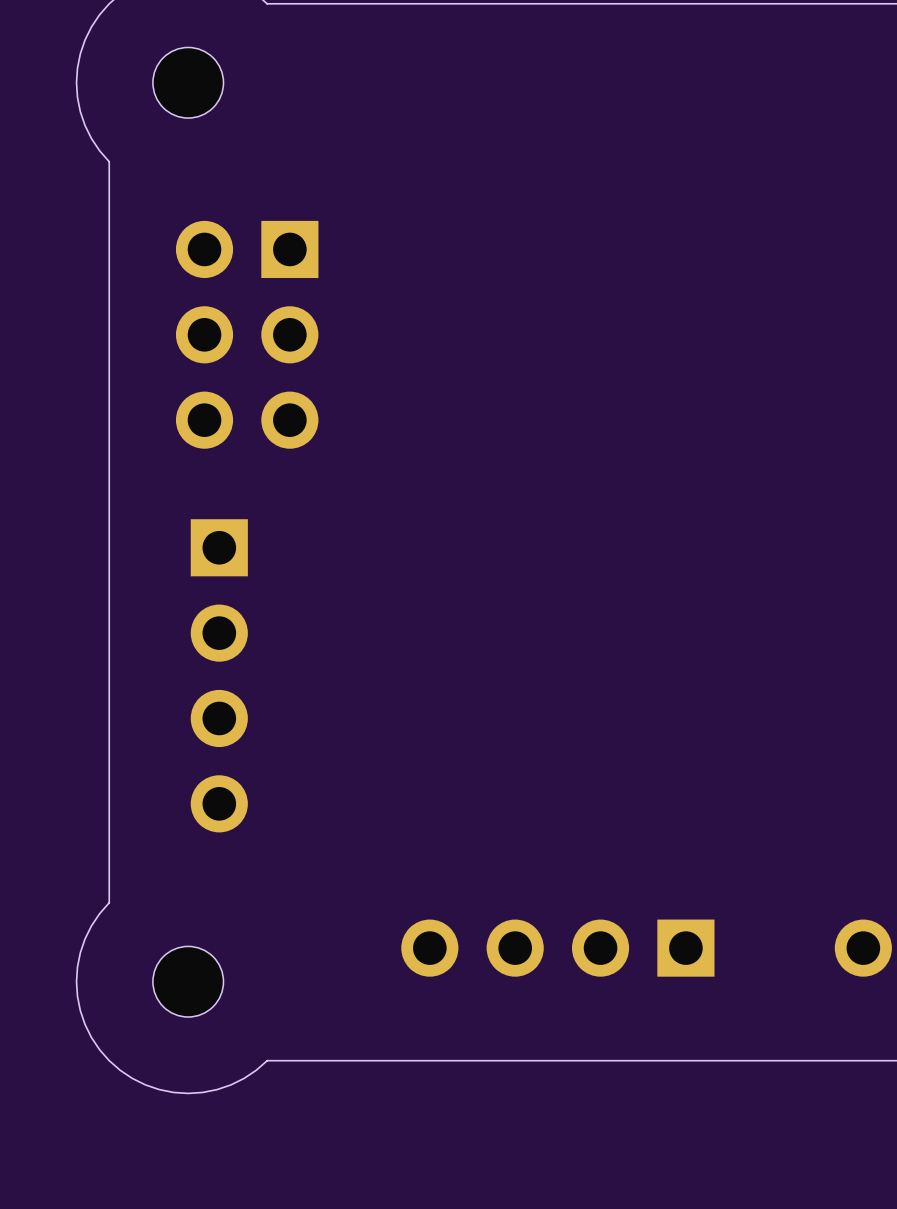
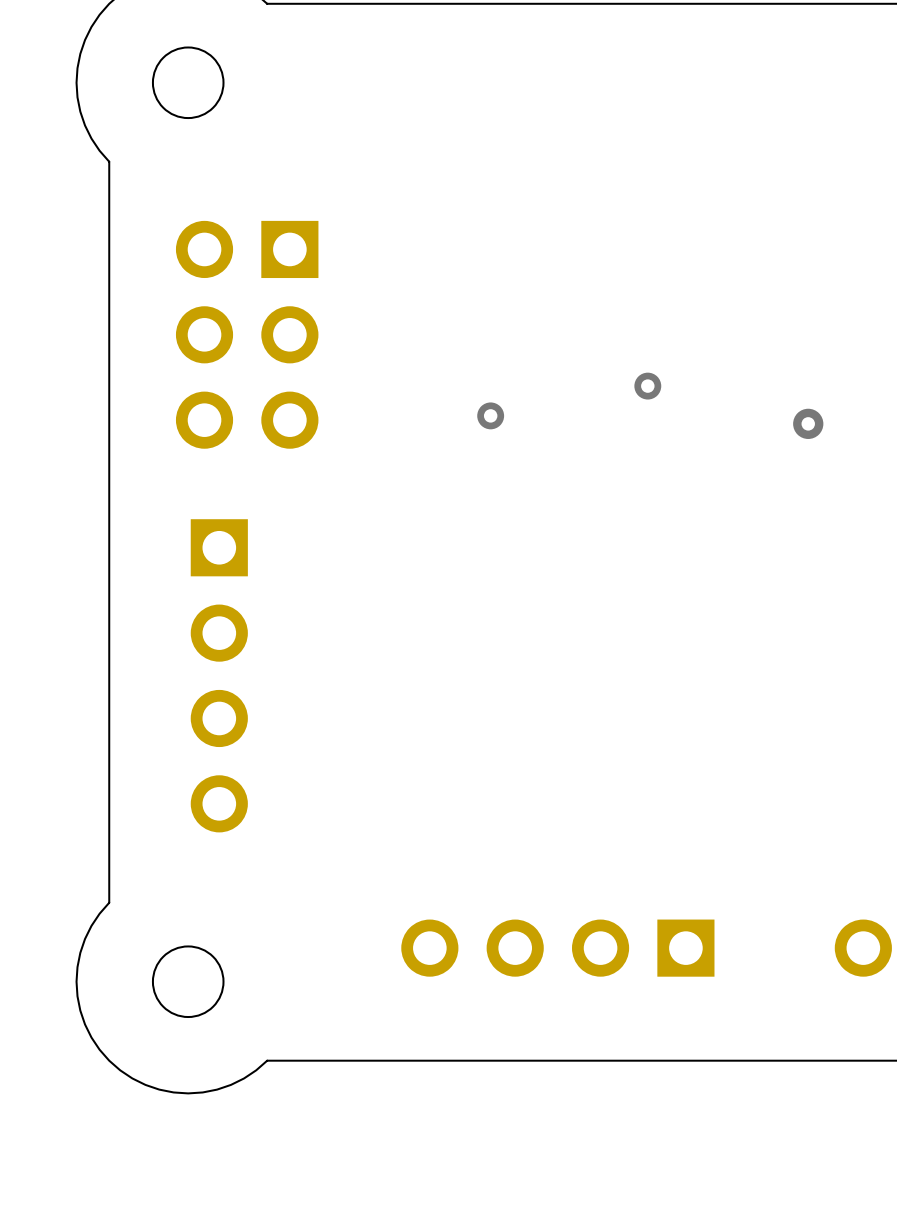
via: none -> (647, 386)
via: none -> (490, 415)
via: none -> (808, 423)

